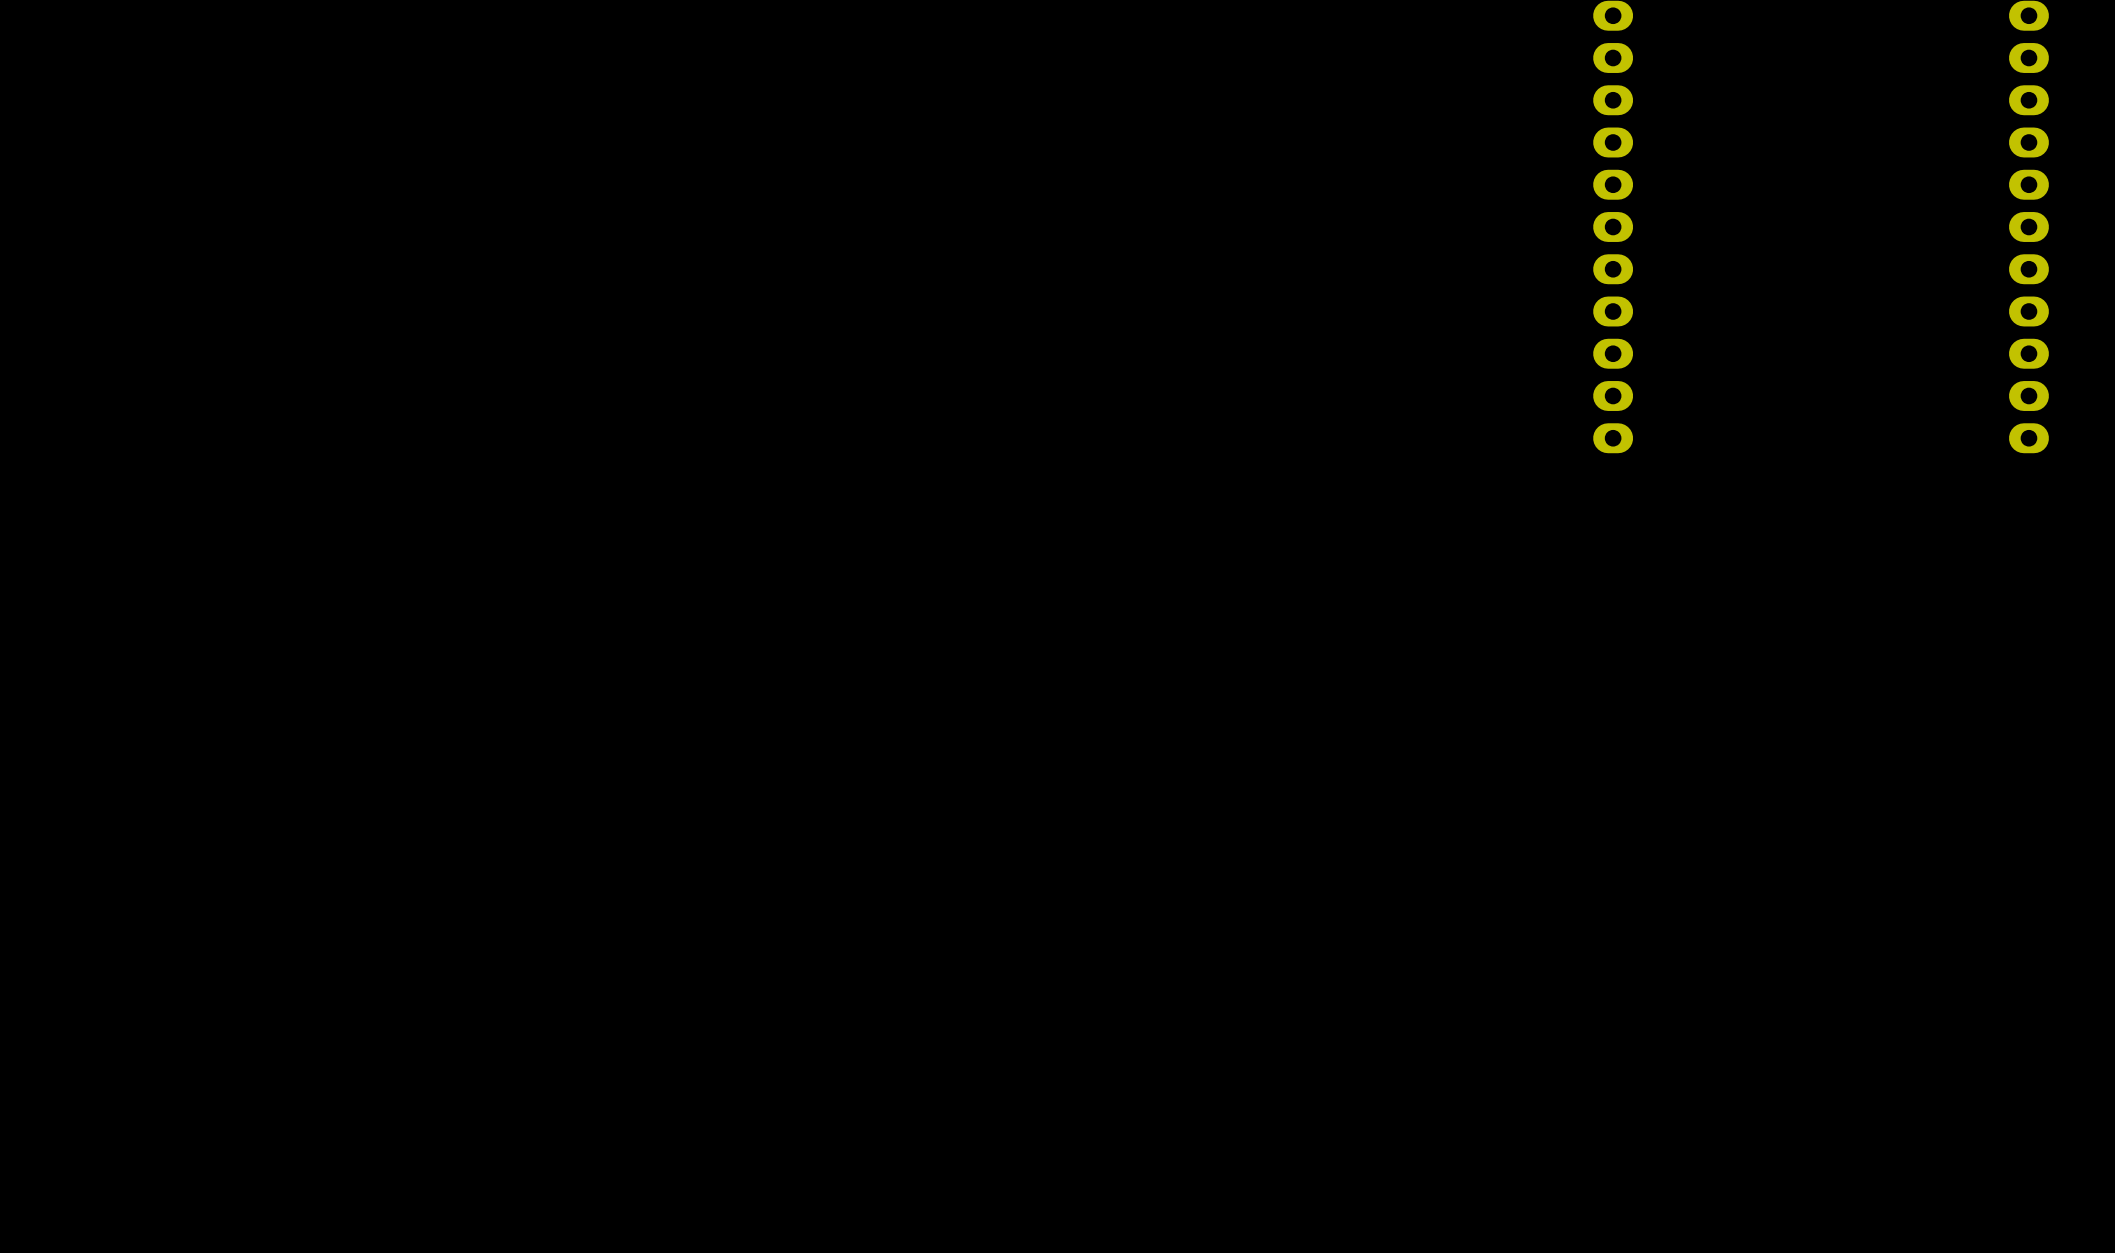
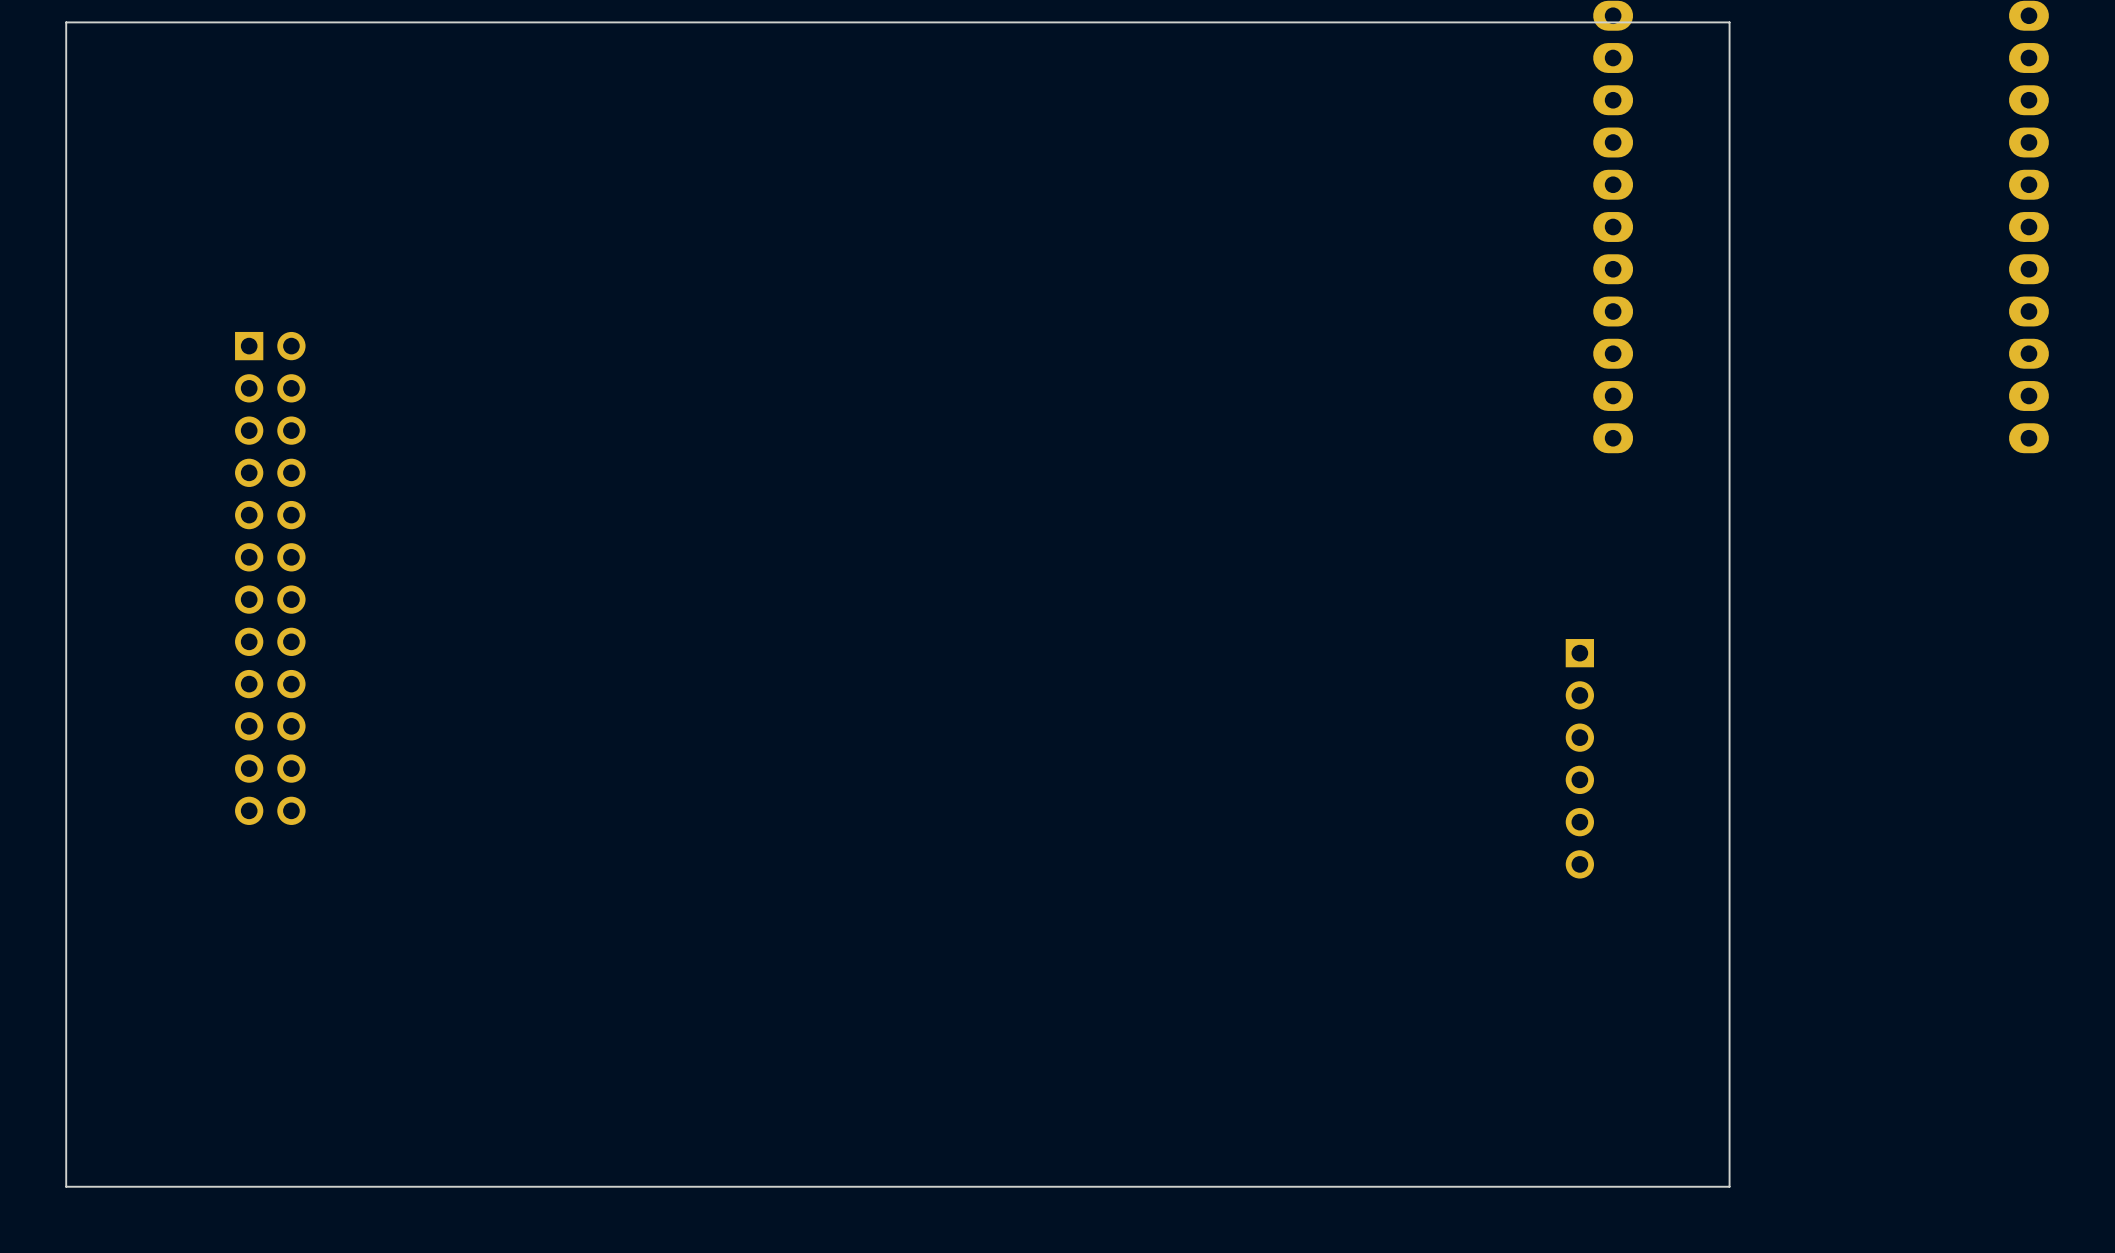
board edge: none -> (1729, 22) (66, 22) (66, 1186) (1729, 1186) (1729, 22)
part: none -> (270, 578)
part: none -> (1579, 758)

